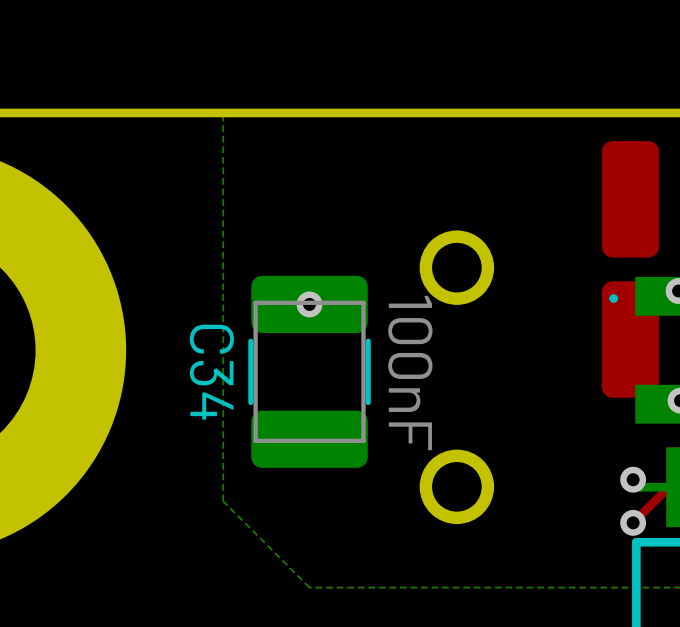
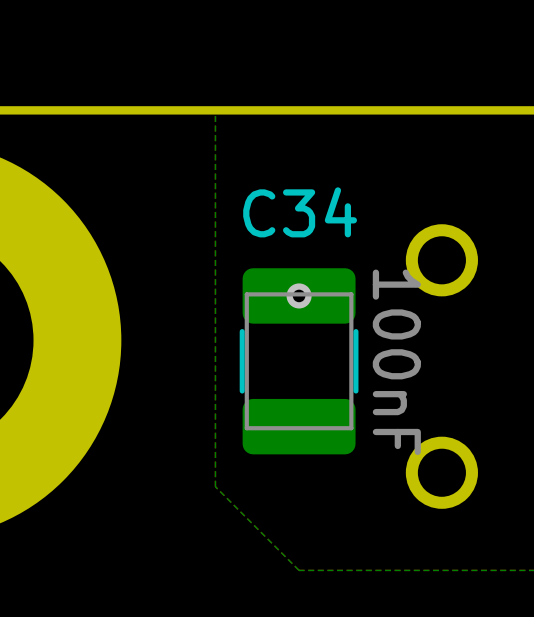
C34 name rotation: 0° (211, 372) -> 90° counterclockwise (300, 212)
C34 name position: C34 (211, 372) -> C34 (300, 212)

